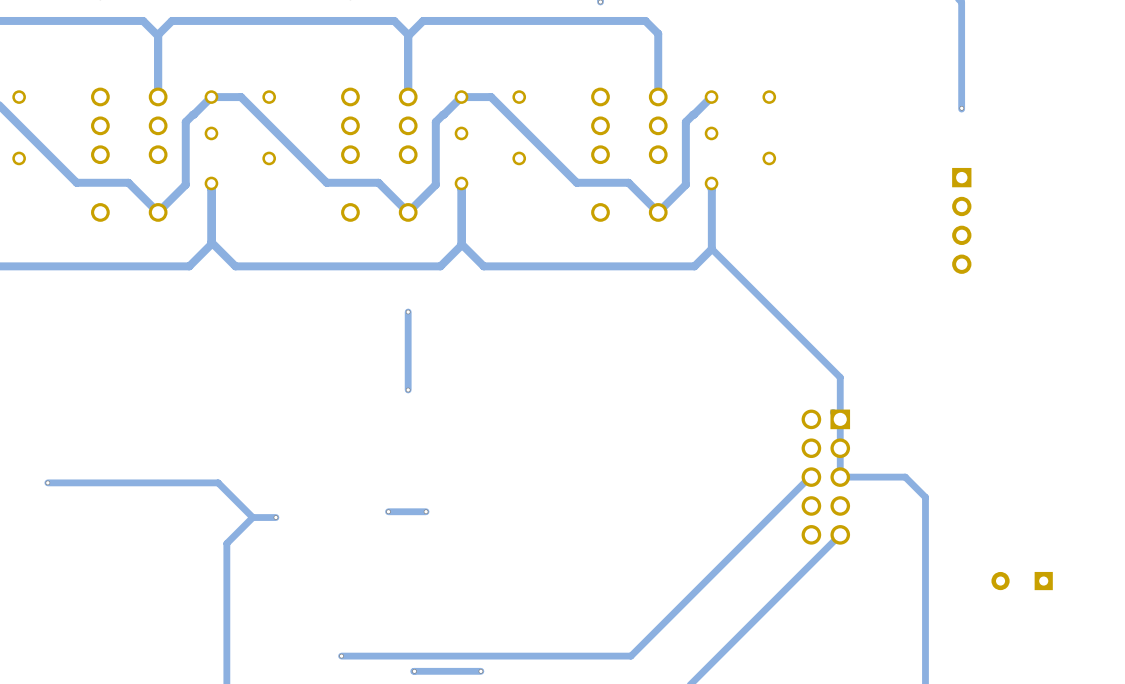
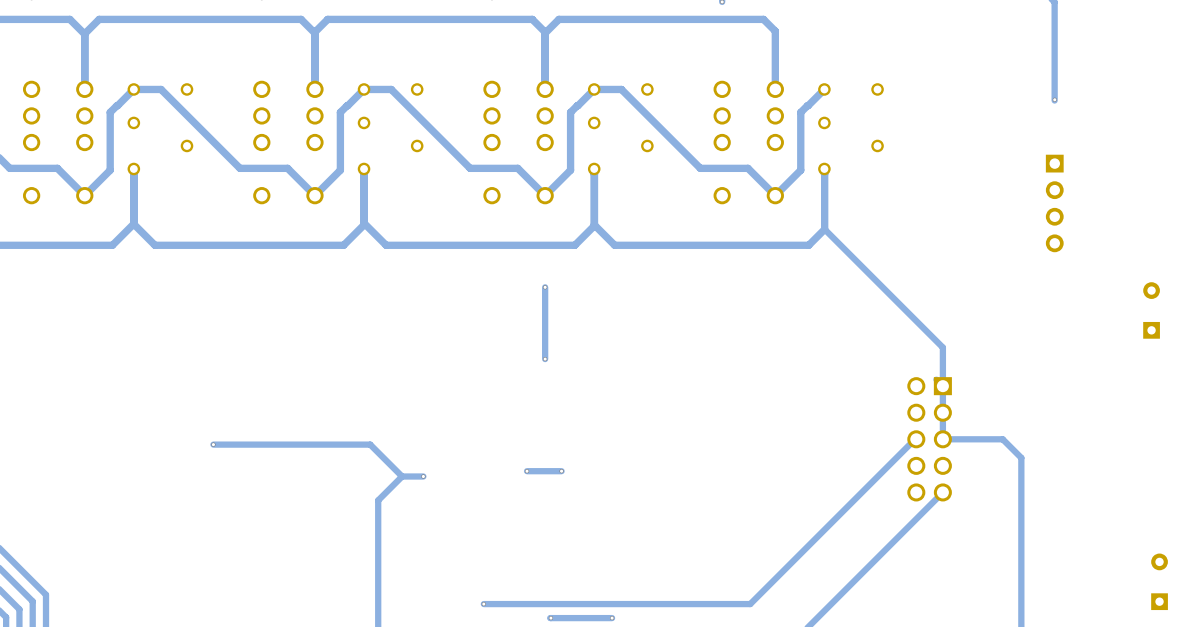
part: none -> (1151, 310)
part rotation: 0° (1022, 581) -> 90° clockwise (1159, 581)
part position: (1022, 581) -> (1159, 581)

